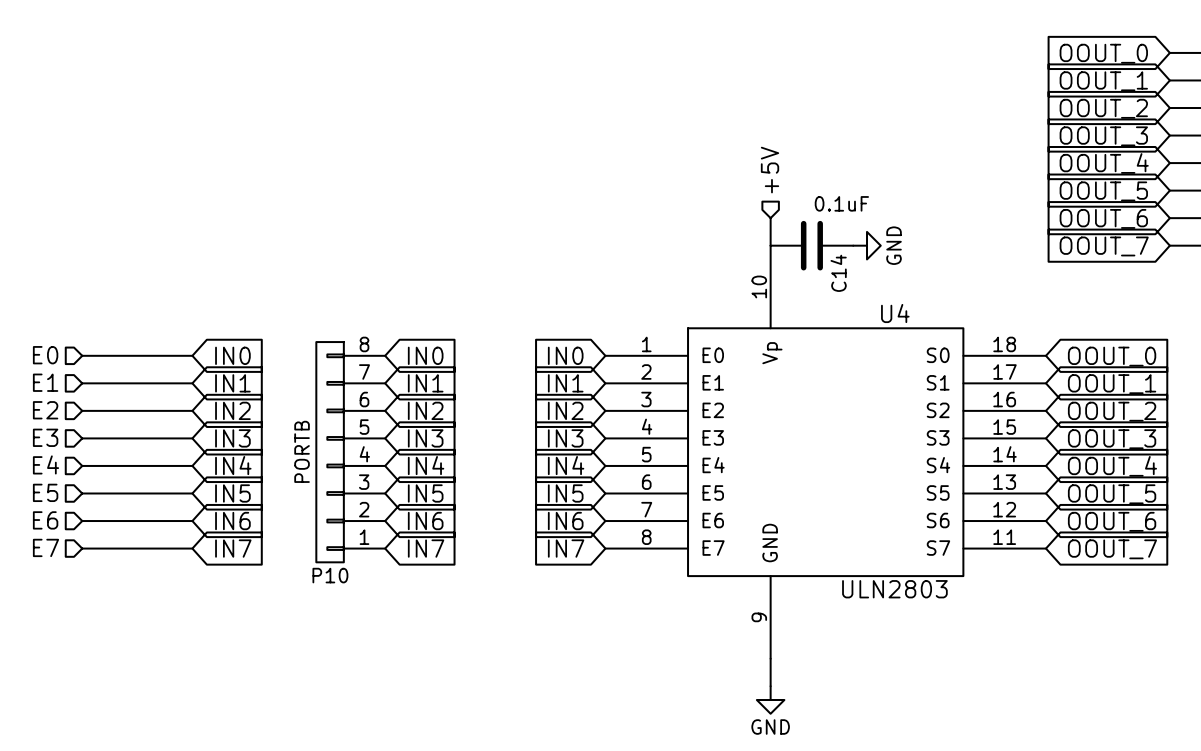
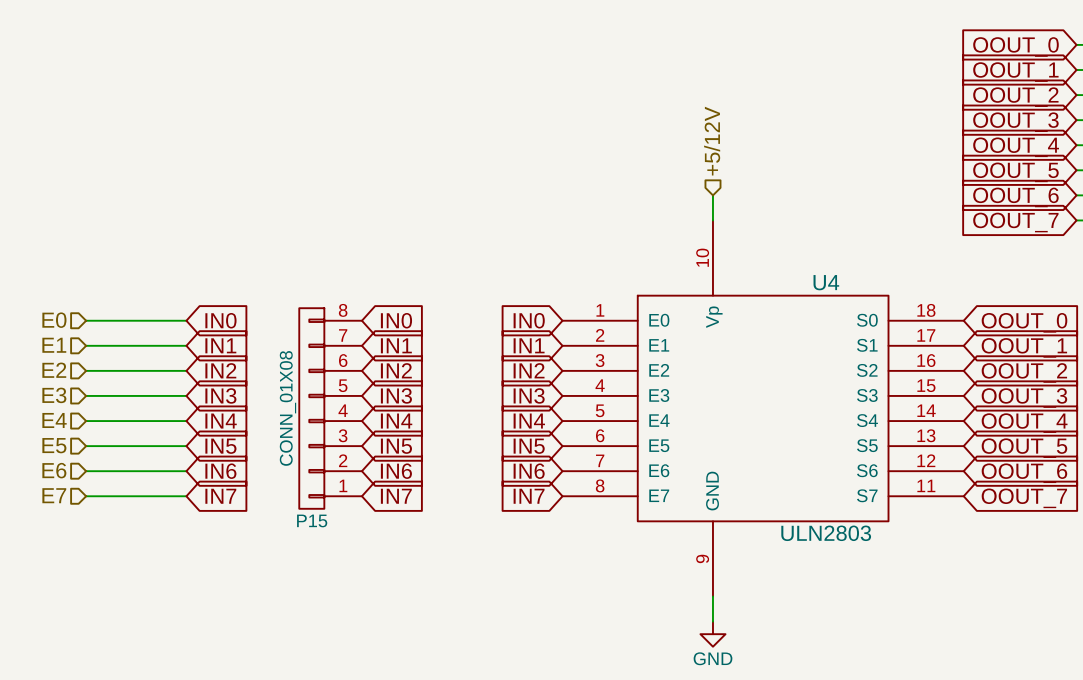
hierarchical label: +5V (770, 170) -> +5/12V (712, 141)
C14: 0.1uF (811, 245) -> none
power symbol: GND (867, 245) -> none
P10 value: PORTB (302, 451) -> CONN_01X08 (287, 408)
P10 name: P10 (330, 575) -> P15 (312, 520)

